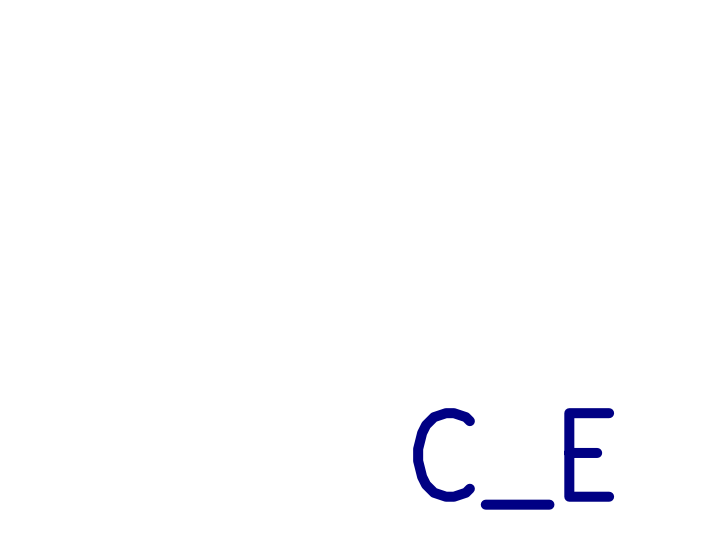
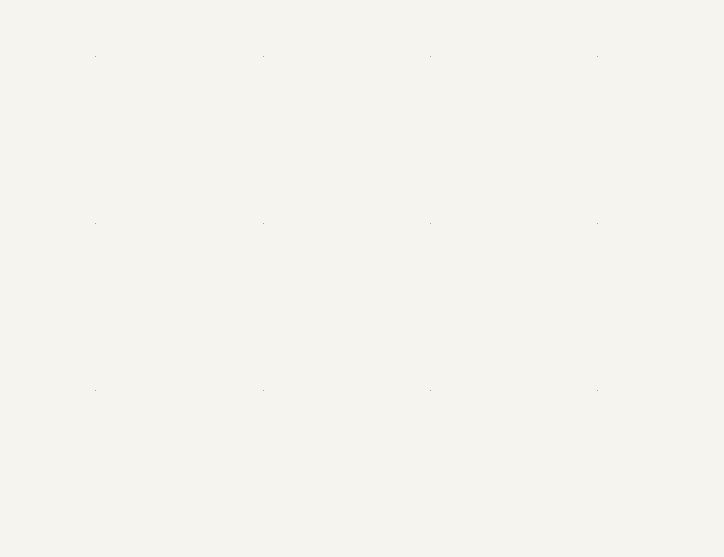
text: C_E (513, 458) -> none

